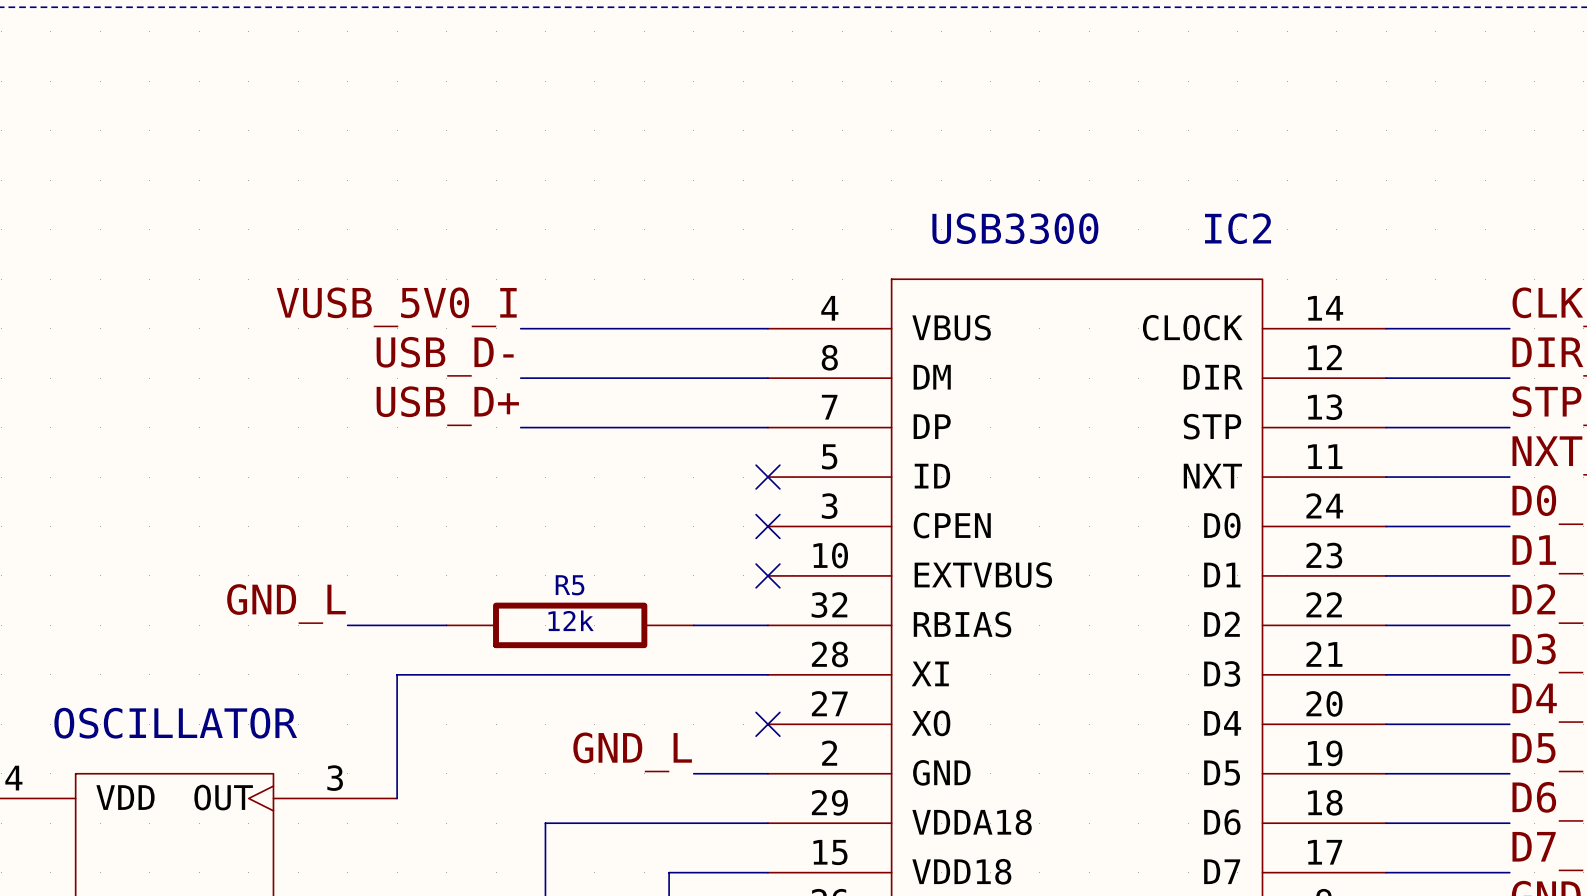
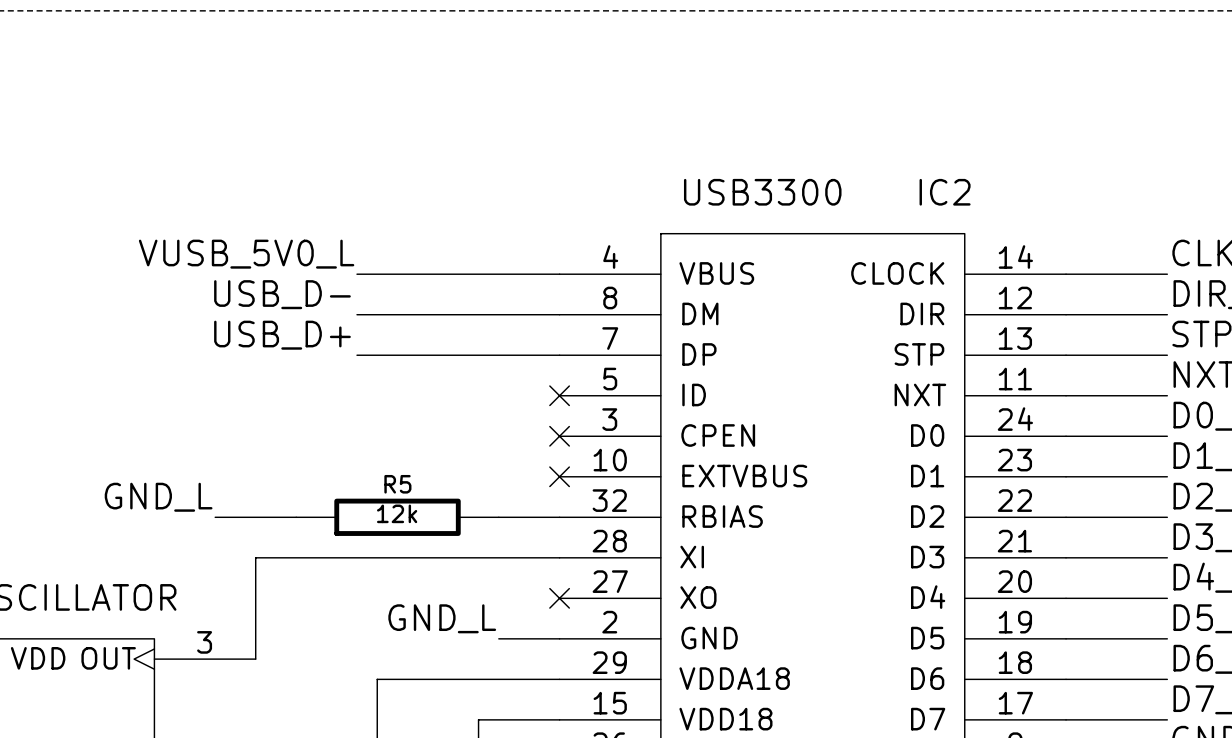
label: VUSB_5V0_I (396, 307) -> VUSB_5V0_L (246, 254)

